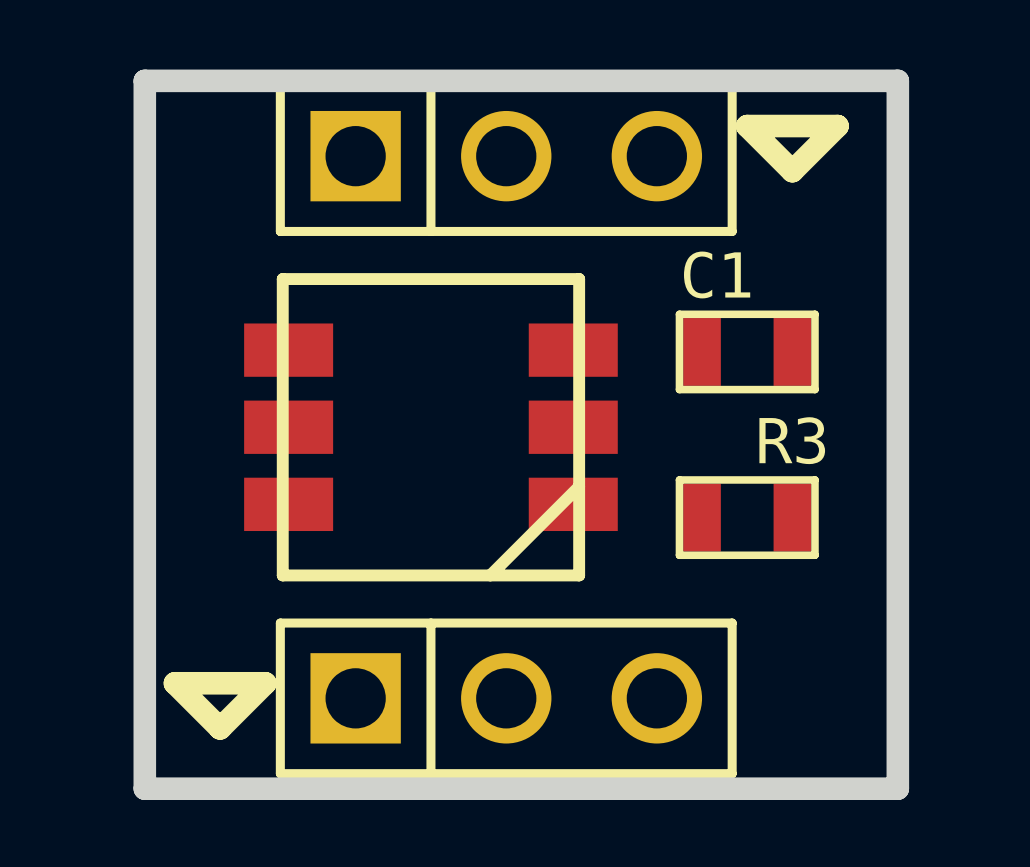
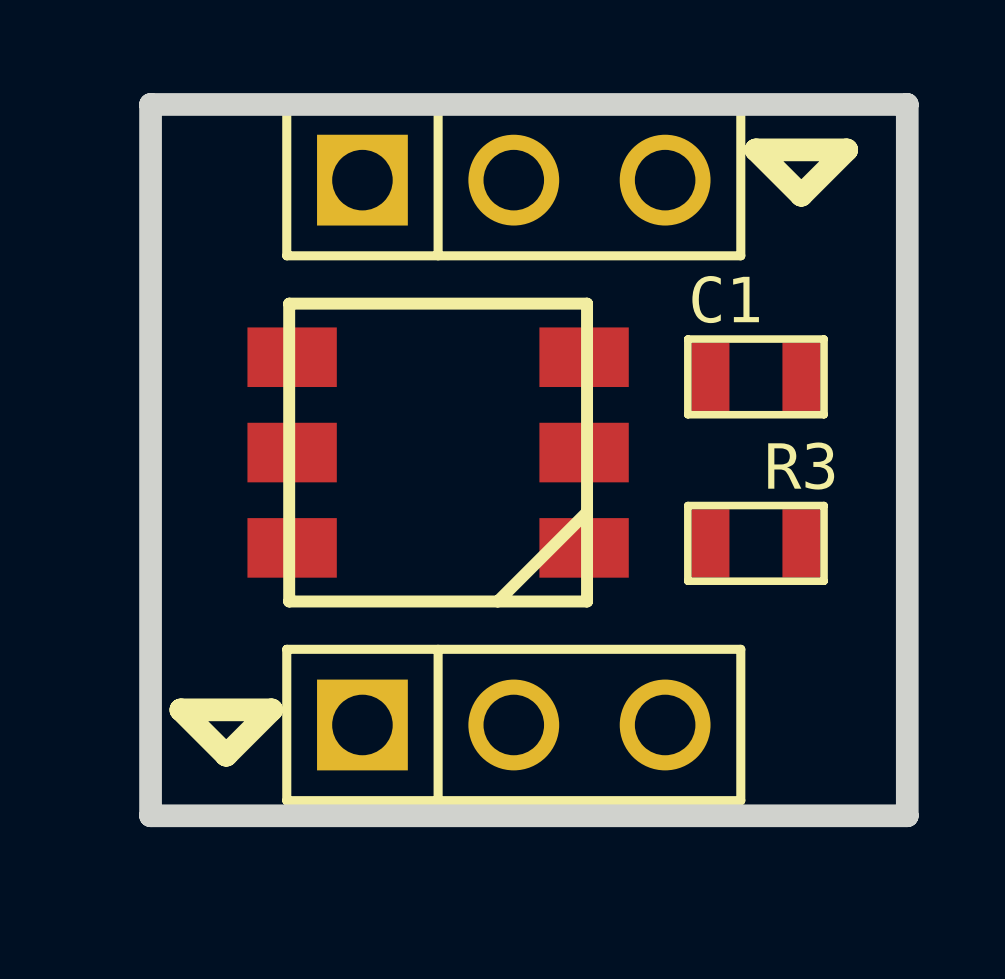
part footprint: [244, 273, 618, 582] -> [247, 297, 629, 608]

